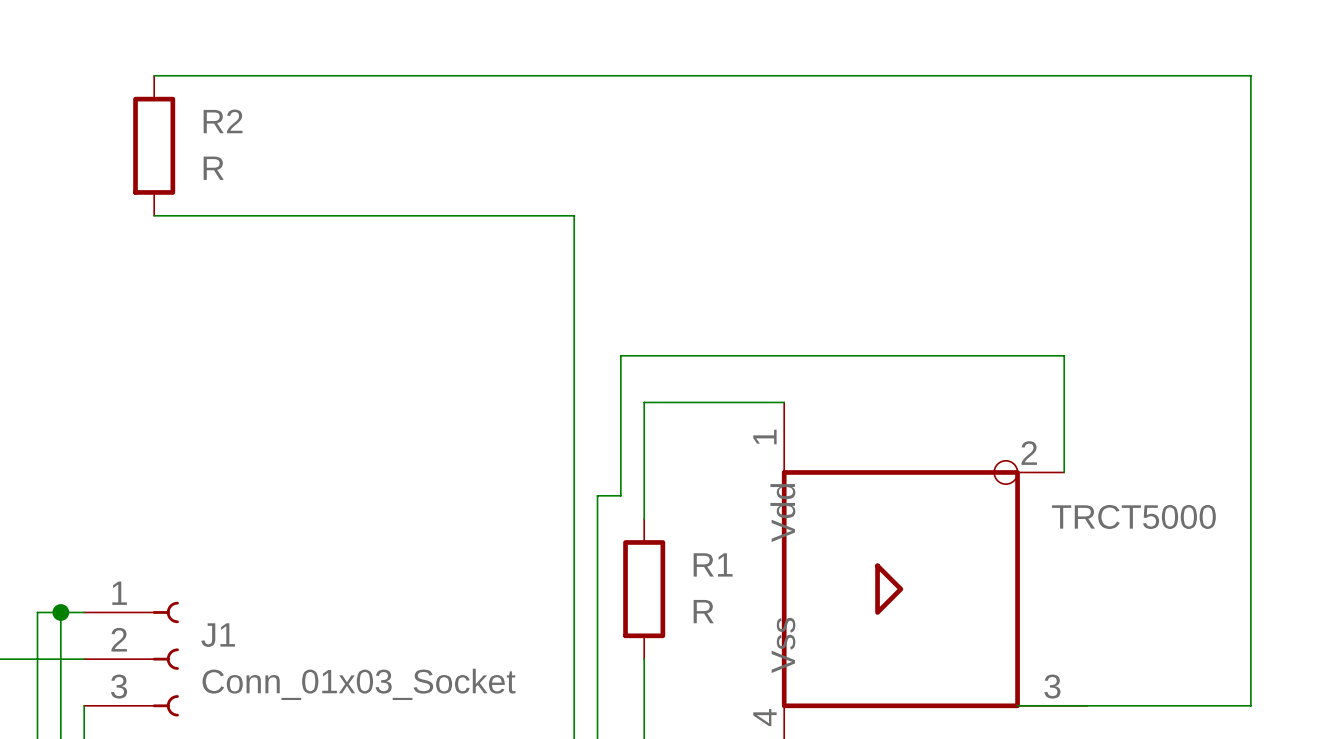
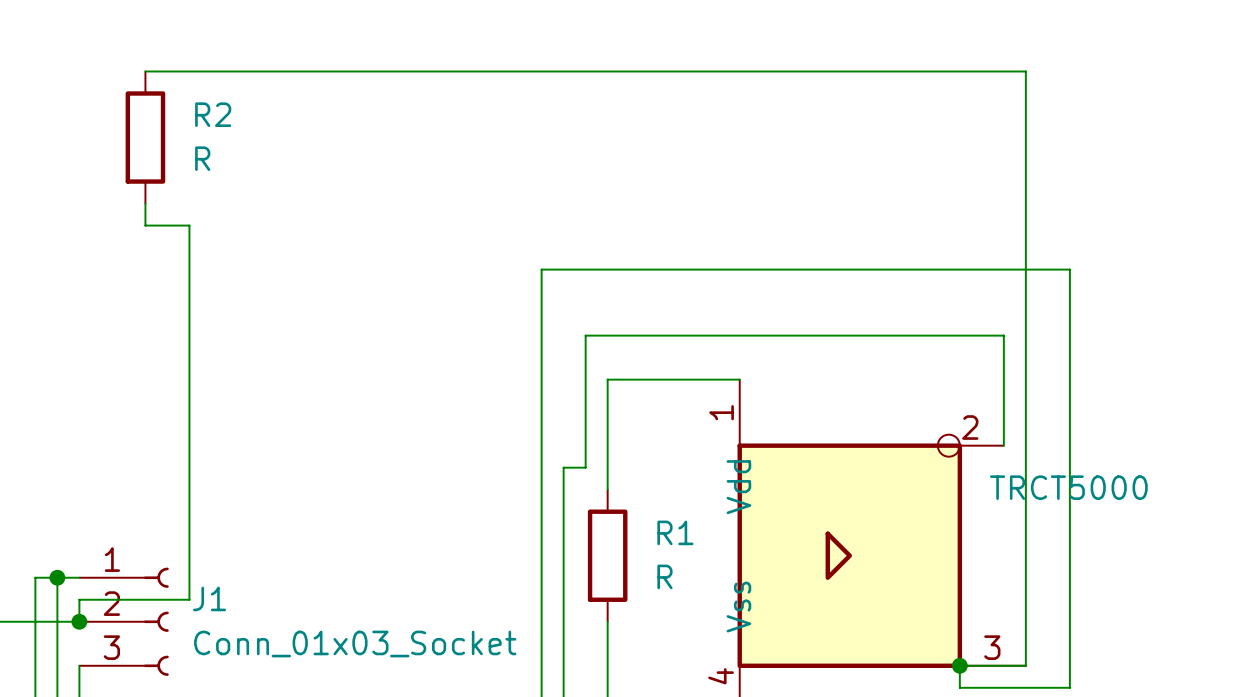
wire: (1087, 75) (1250, 75) (1250, 705) (1087, 705) -> (1025, 71) (1025, 665)
wire: (154, 215) (574, 215) (574, 285) -> (145, 203) (145, 225) (189, 225) (189, 599) (79, 599) (79, 621)
wire: none -> (541, 269) (1069, 269) (1069, 687) (959, 687) (959, 665)
junction: none -> (79, 621)
junction: none -> (959, 665)

